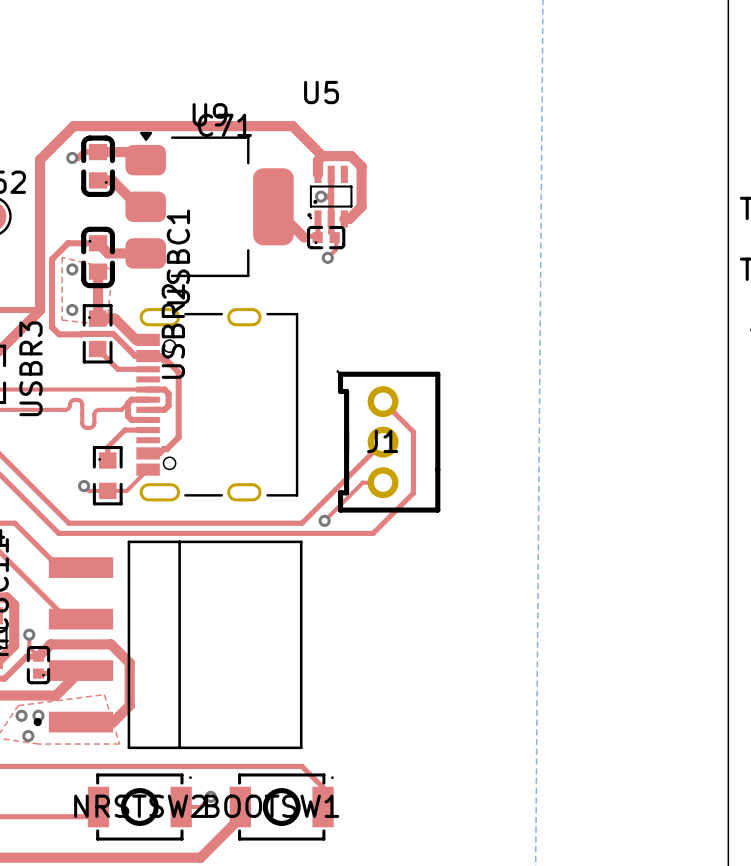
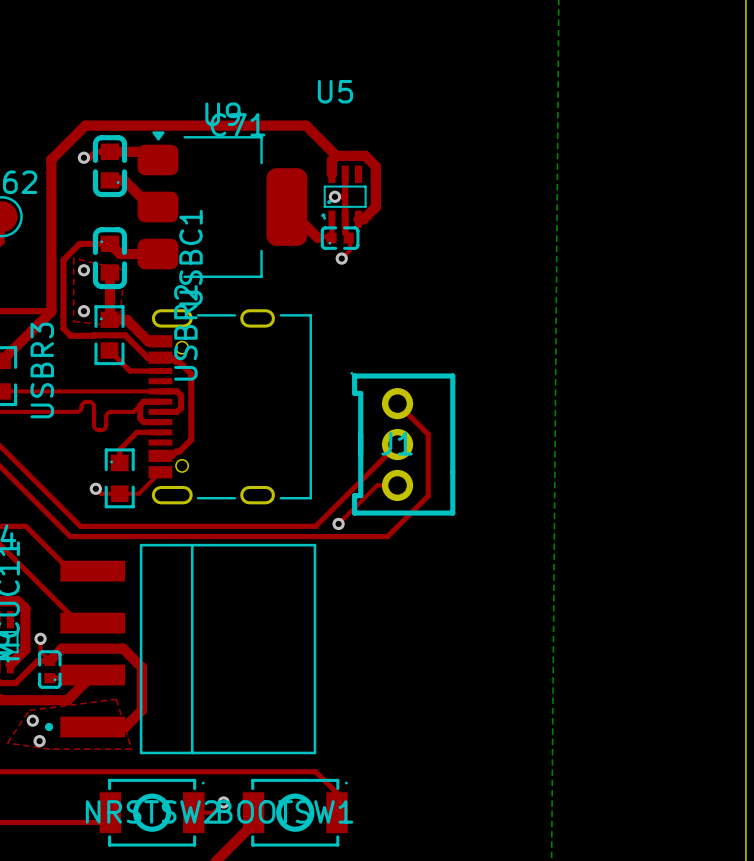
via: (38, 715) -> none

